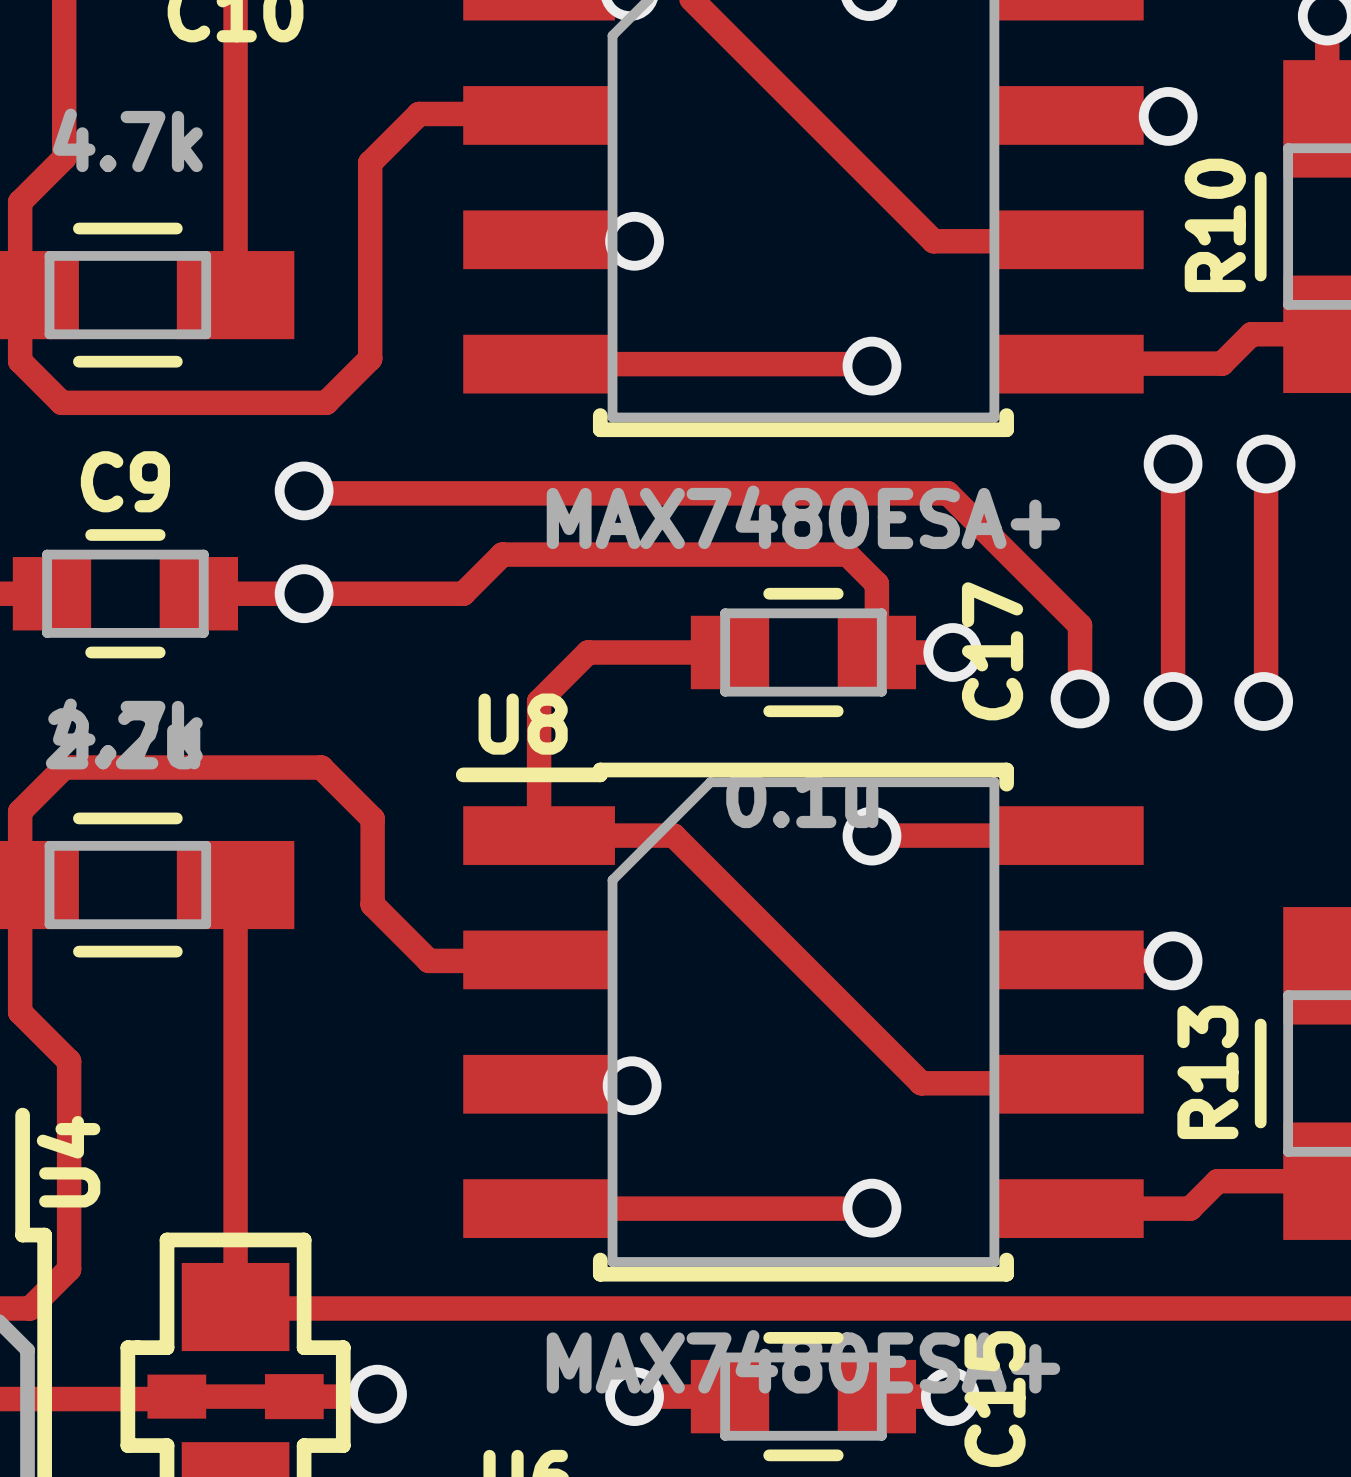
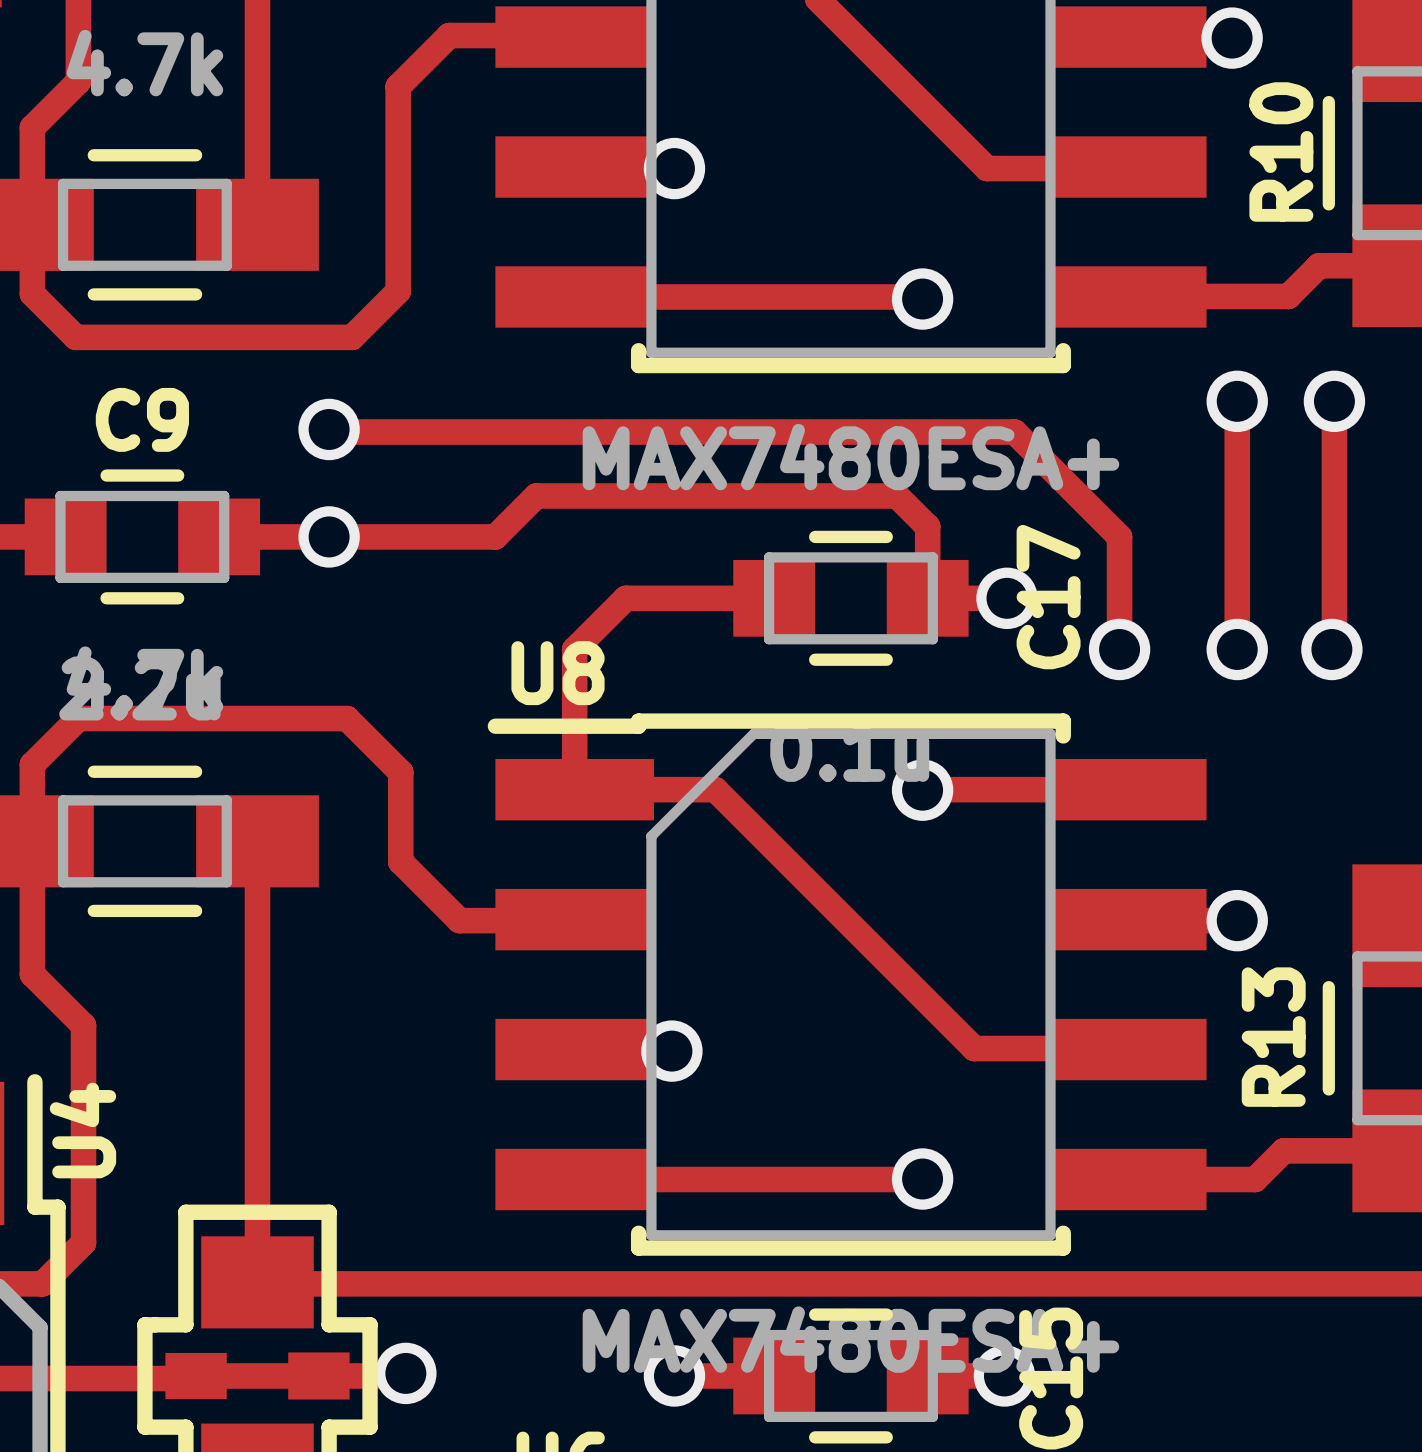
track: (947, 493) (1080, 625) (1080, 698) -> (1001, 432) (1014, 432) (1119, 536) (1119, 649)
via position: (1080, 698) -> (1119, 649)

